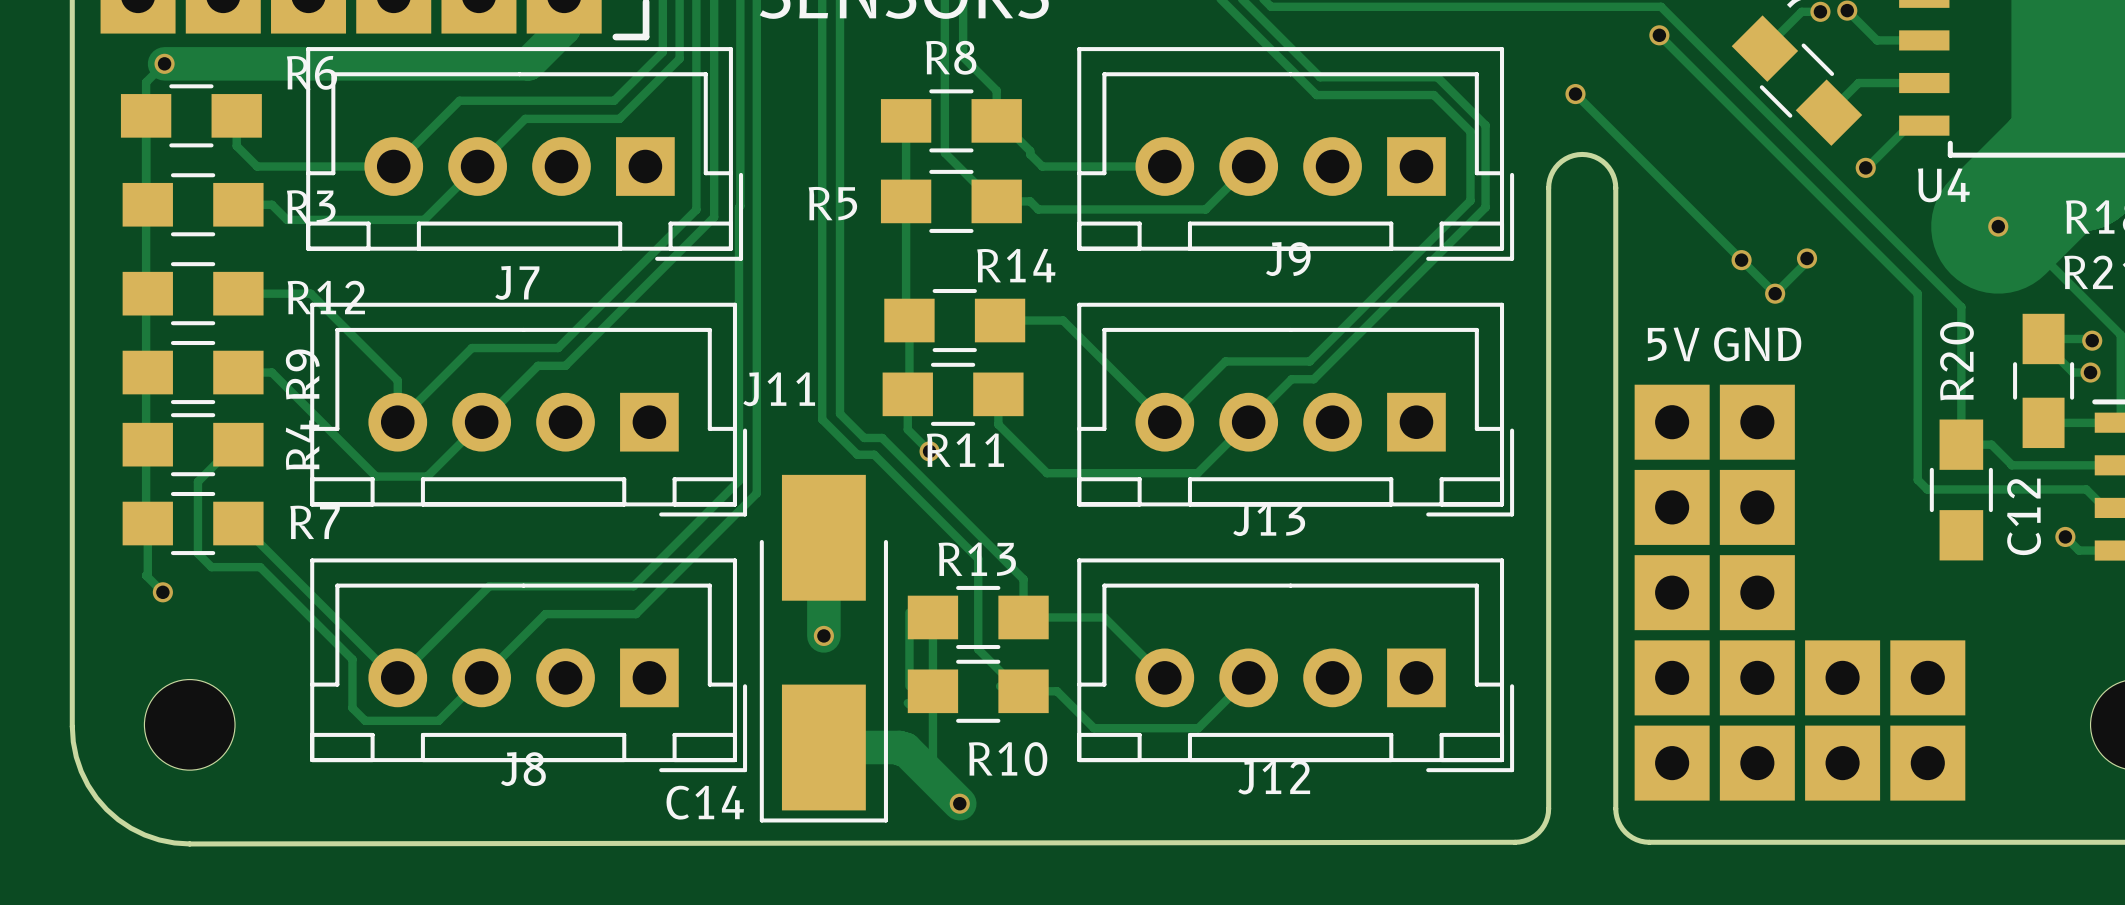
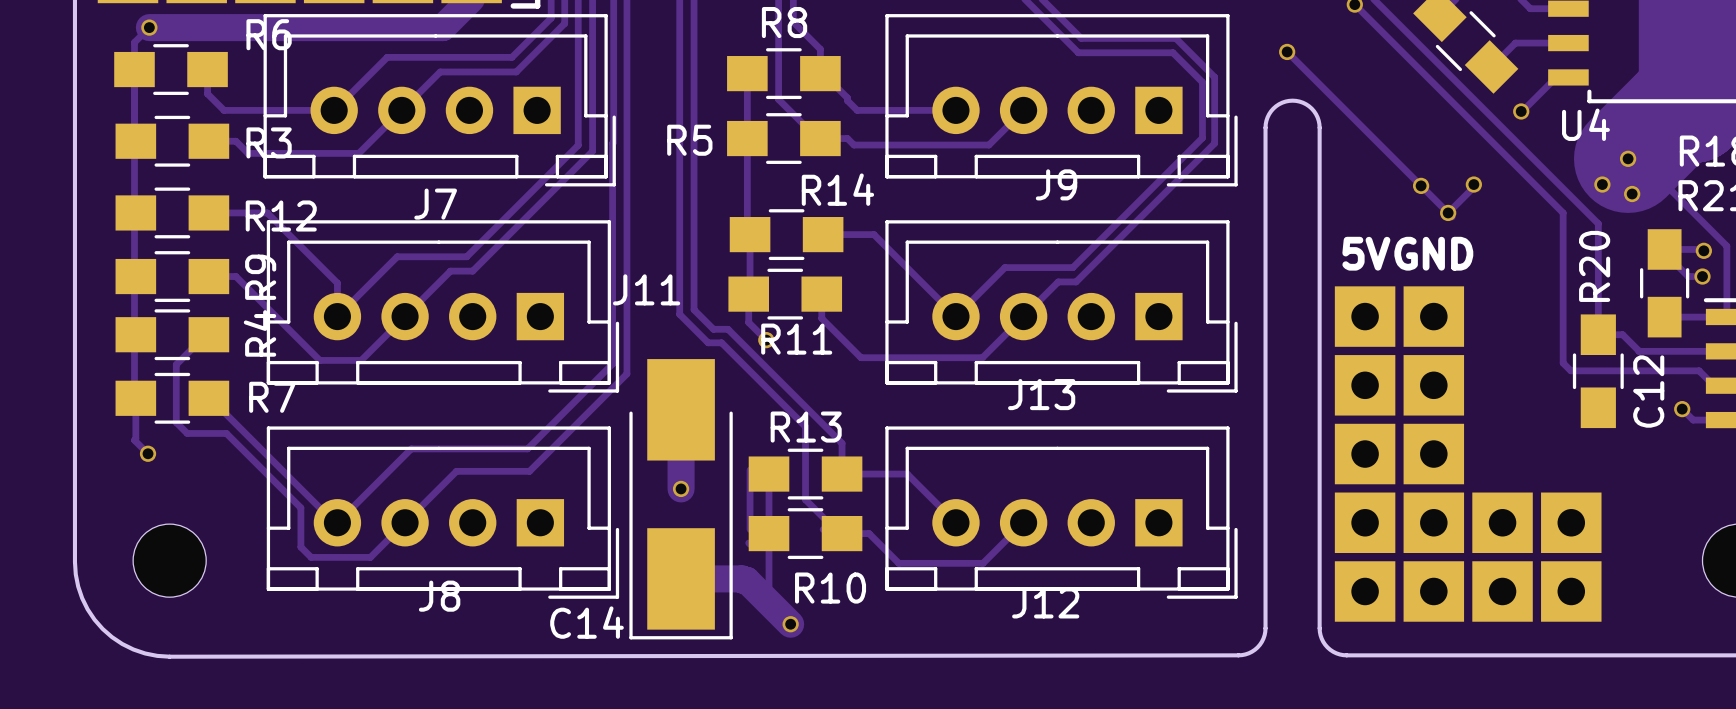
via: none -> (1602, 184)
via: none -> (1632, 194)

